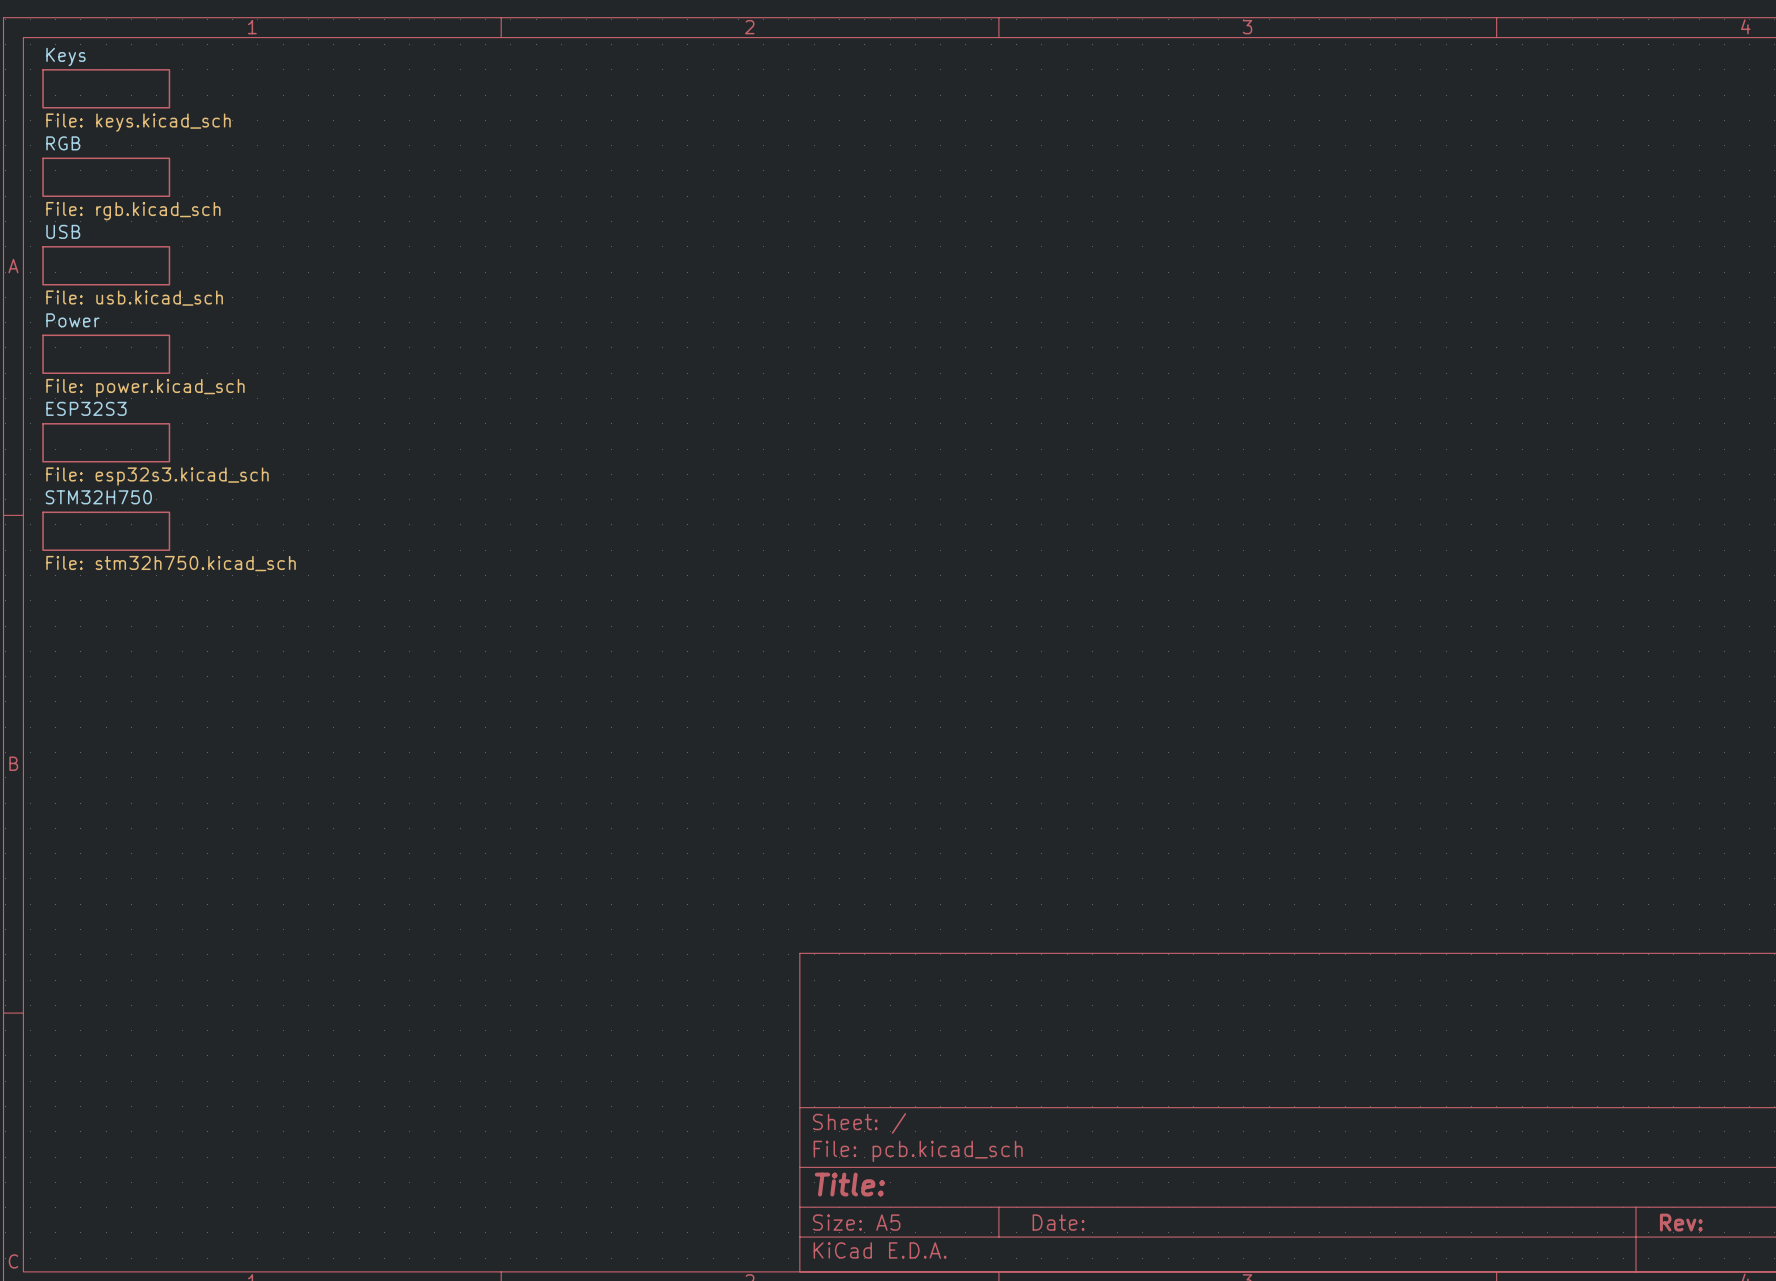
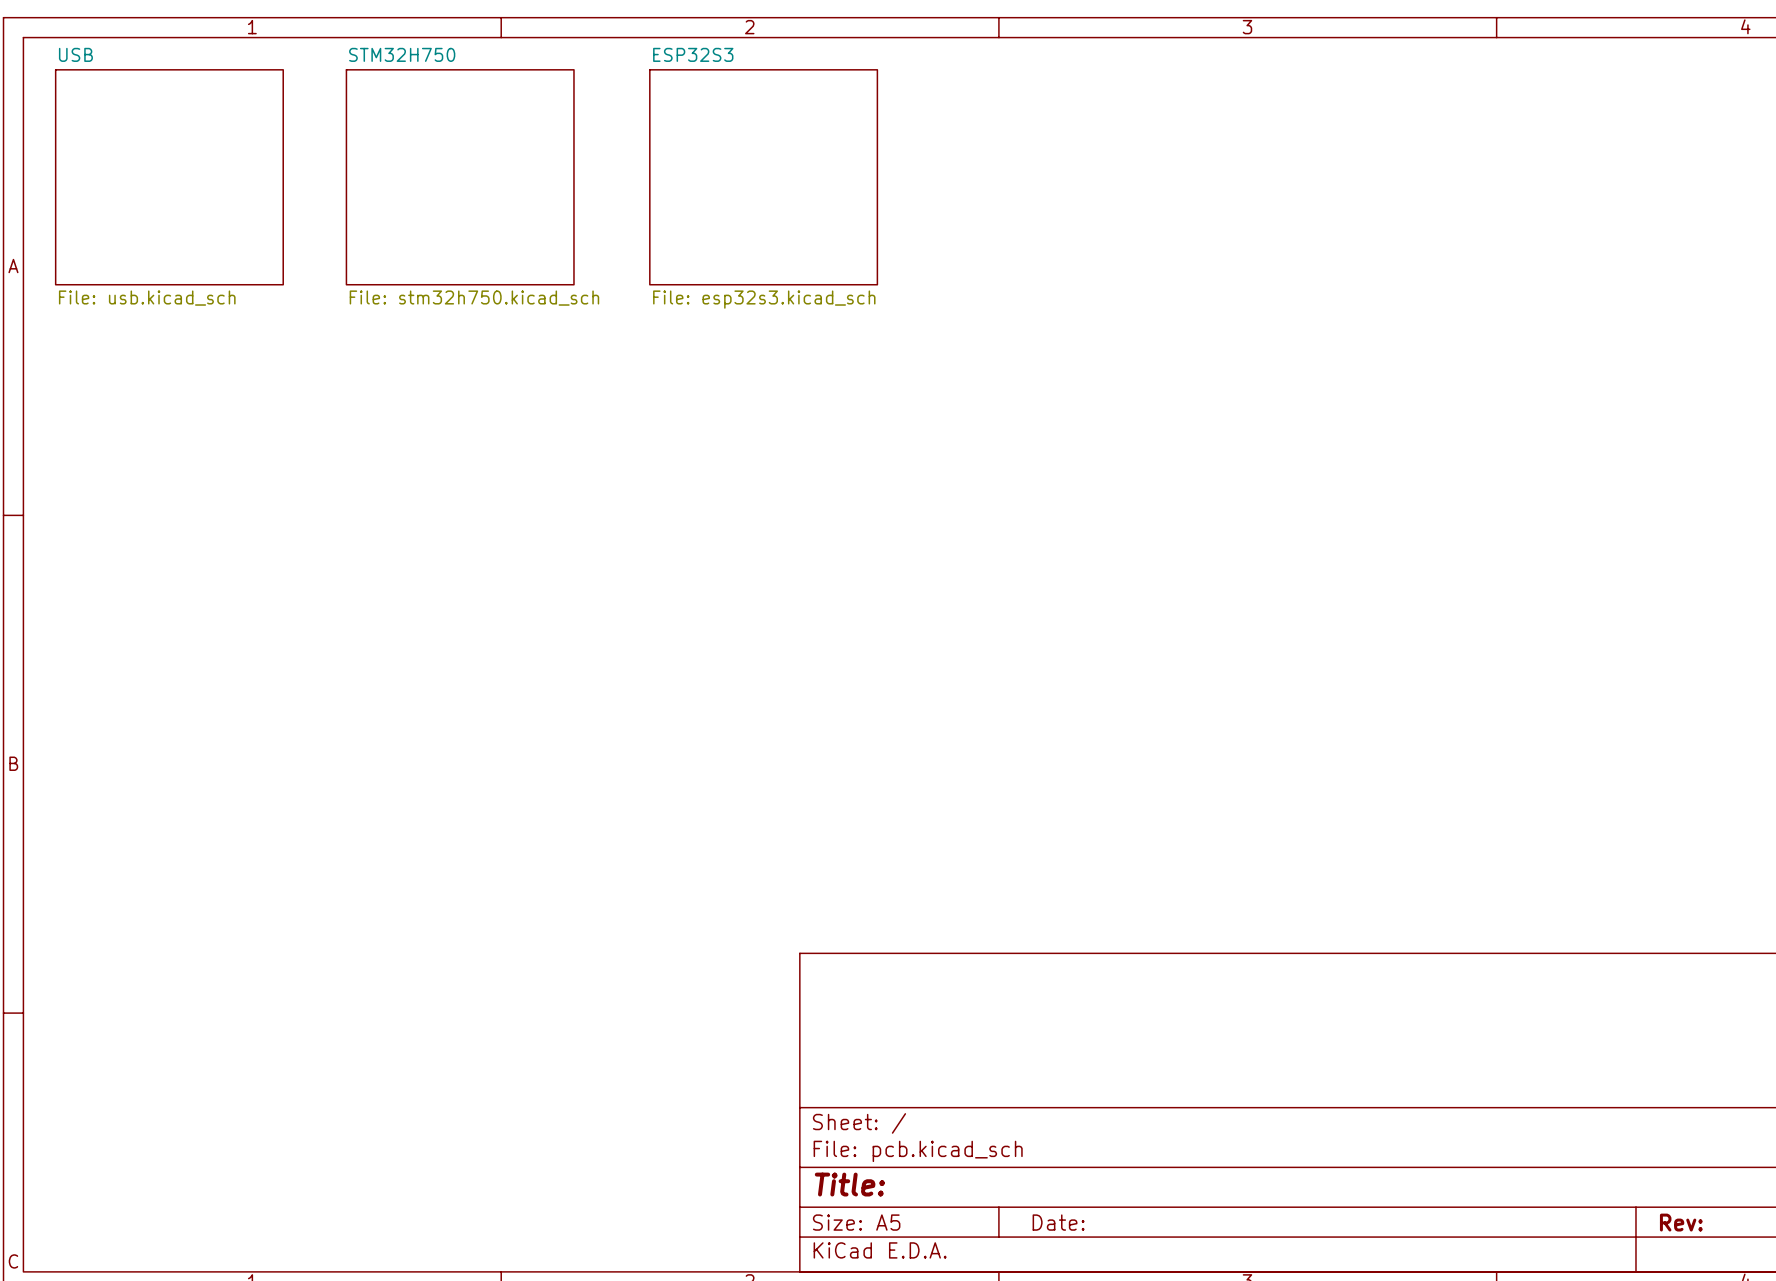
sheet Keys: File: keys.kicad_sch (106, 88) -> none
sheet RGB: File: rgb.kicad_sch (106, 177) -> none
sheet USB: none -> File: usb.kicad_sch (169, 177)
sheet USB: File: usb.kicad_sch (106, 265) -> none
sheet Power: File: power.kicad_sch (106, 354) -> none
sheet ESP32S3 name position: ESP32S3 (86, 408) -> ESP32S3 (693, 54)
sheet ESP32S3 shape: [42, 423, 171, 463] -> [649, 69, 879, 286]
sheet ESP32S3 value position: File: esp32s3.kicad_sch (157, 476) -> File: esp32s3.kicad_sch (764, 299)
sheet STM32H750 name position: STM32H750 (98, 497) -> STM32H750 (402, 54)
sheet STM32H750 shape: [42, 511, 171, 551] -> [345, 69, 575, 286]
sheet STM32H750 value position: File: stm32h750.kicad_sch (171, 563) -> File: stm32h750.kicad_sch (474, 298)

